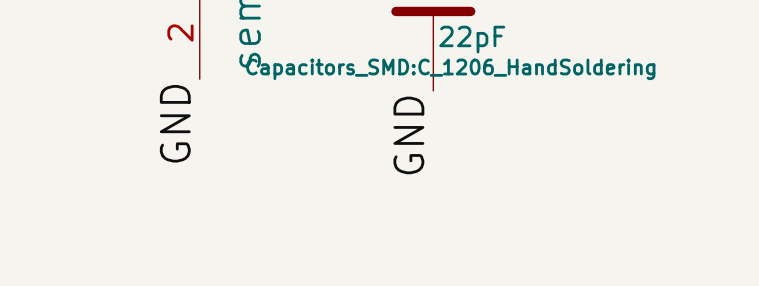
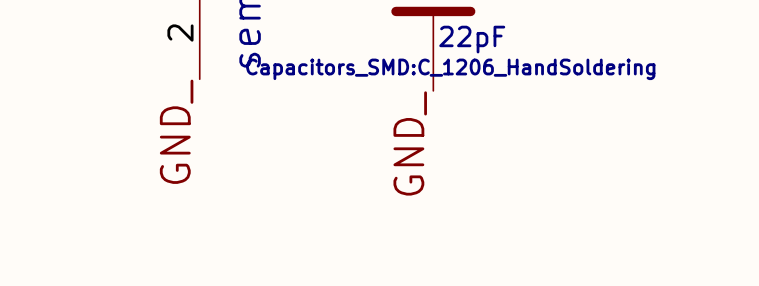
label: GND (175, 123) -> GND_ (176, 131)
label: GND (408, 135) -> GND_ (410, 143)

